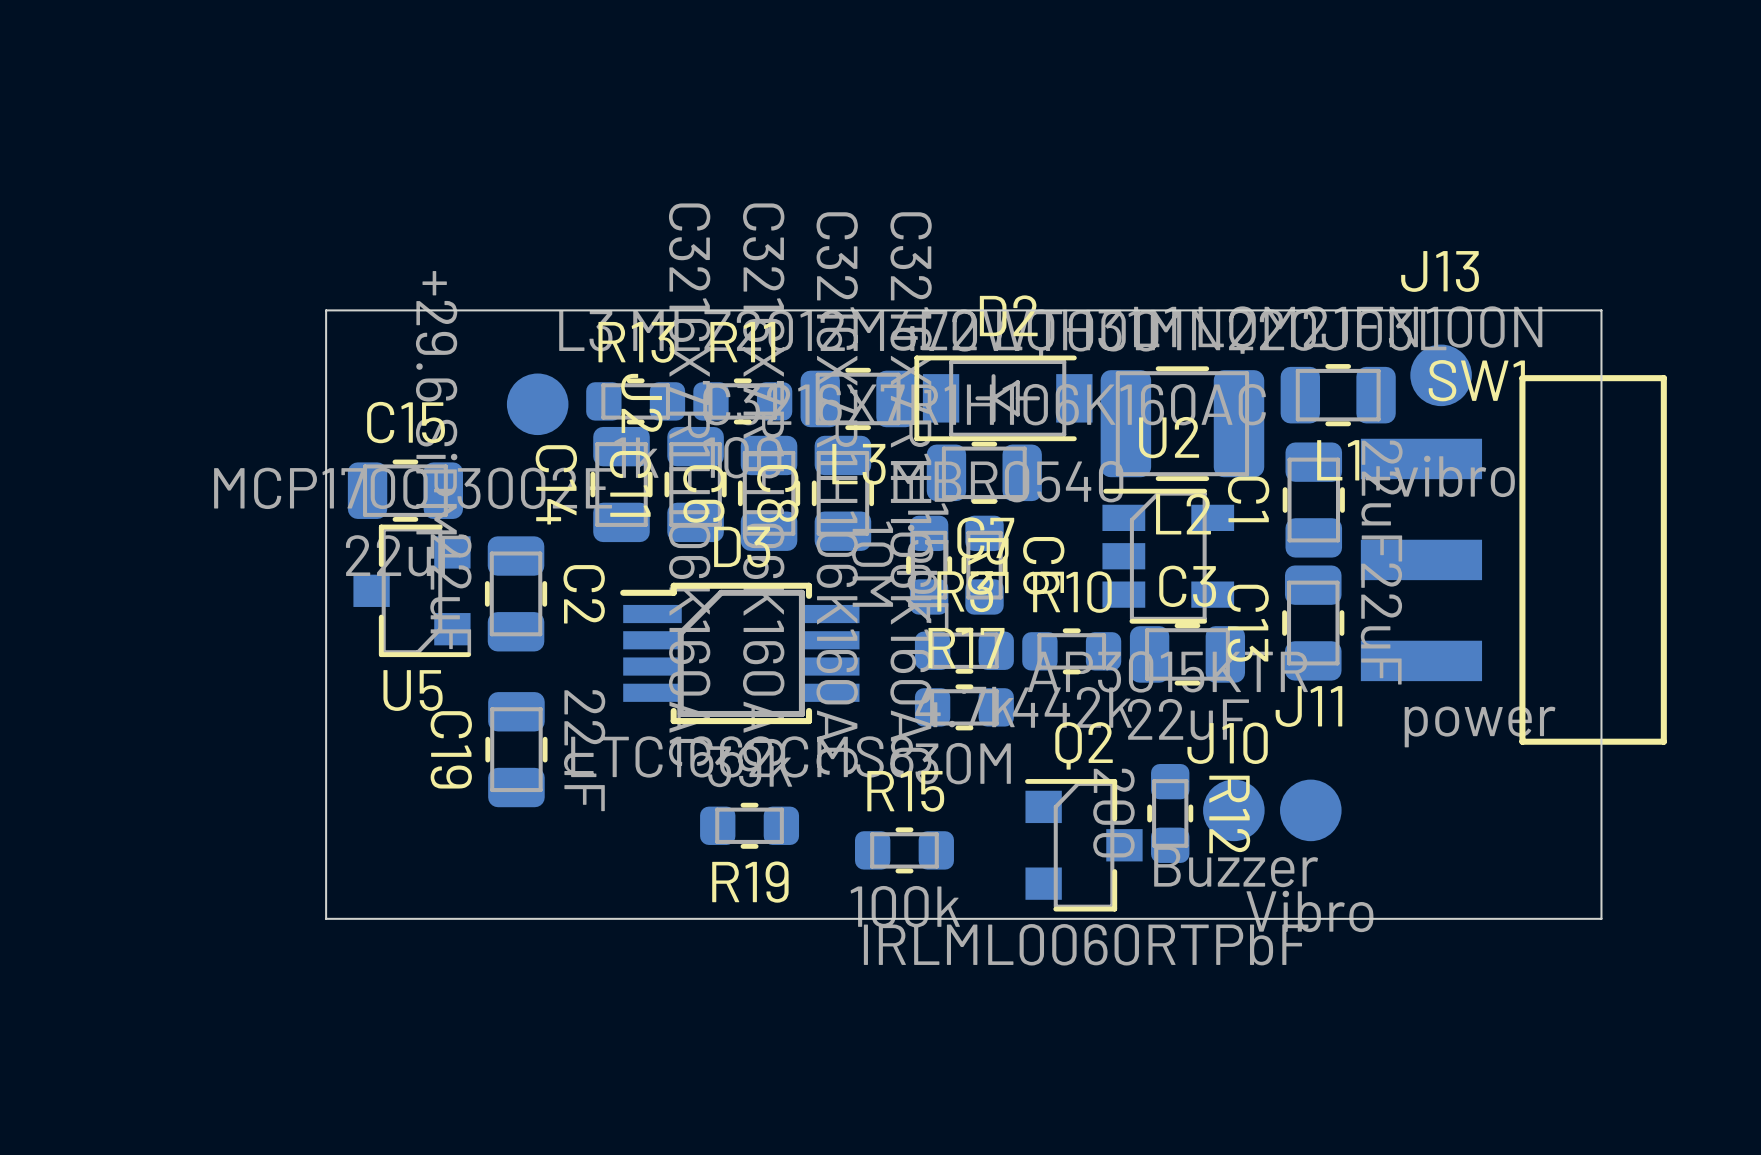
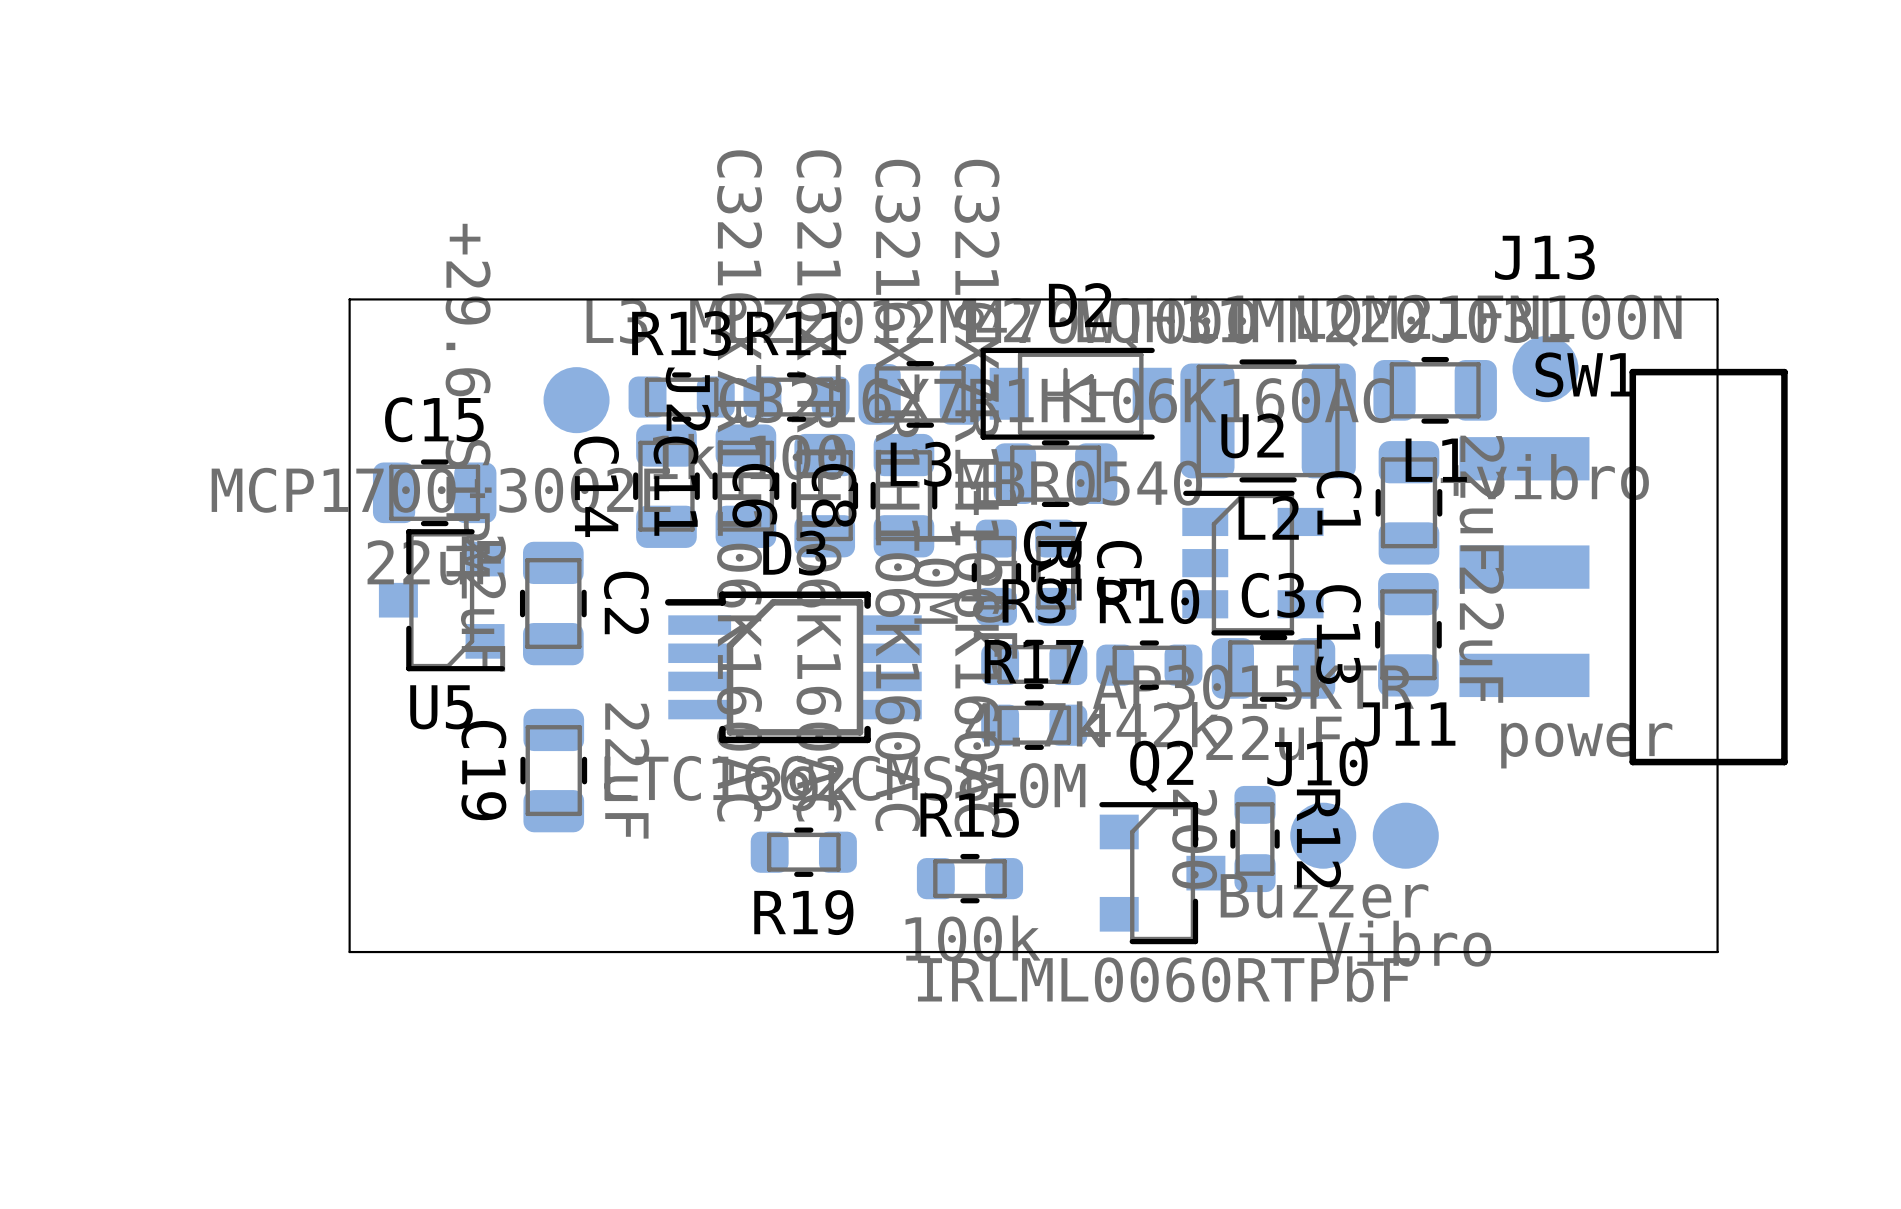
R17 value: 30M (963, 763) -> 10M (1036, 785)

